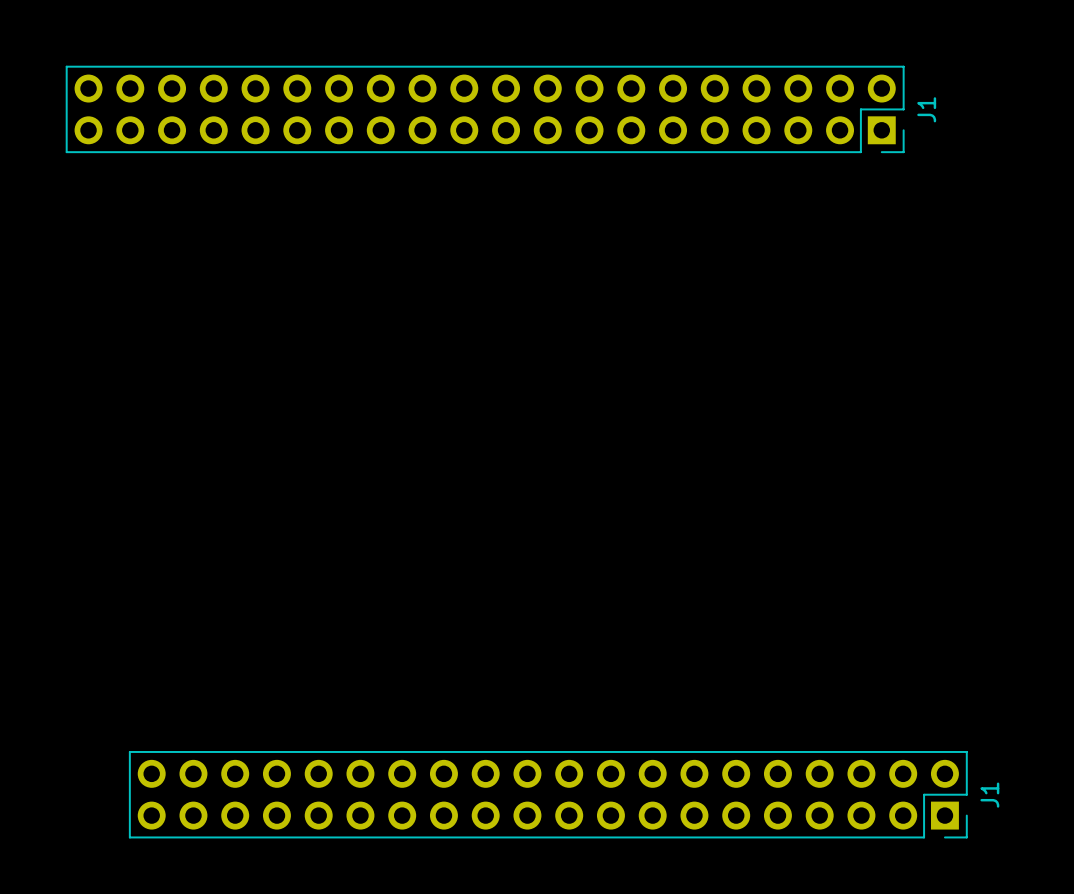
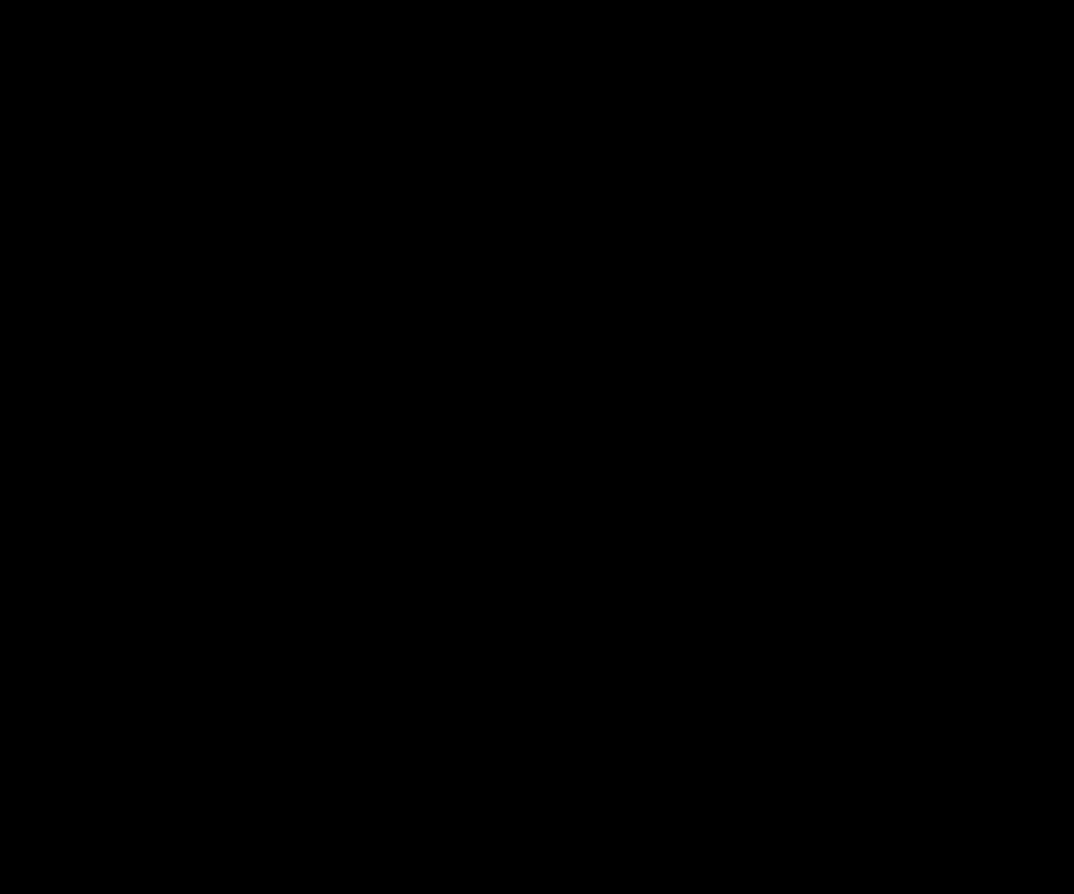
J1: (485, 109) -> none
J1: (548, 794) -> none

